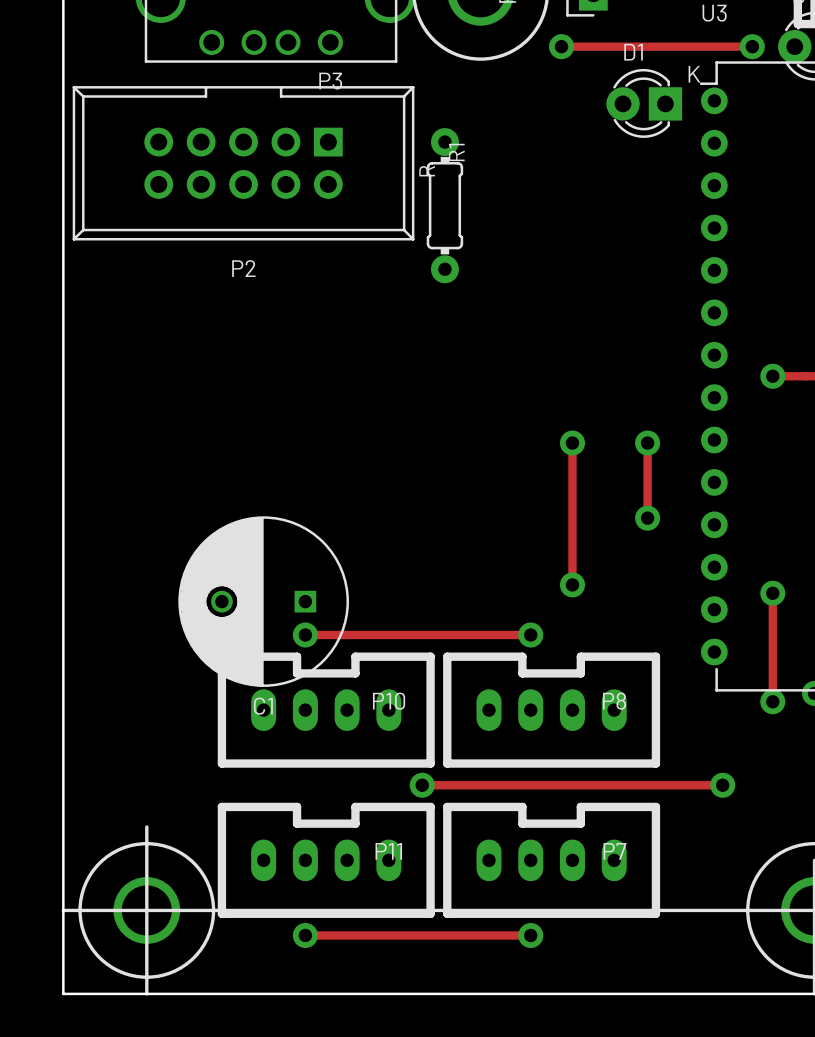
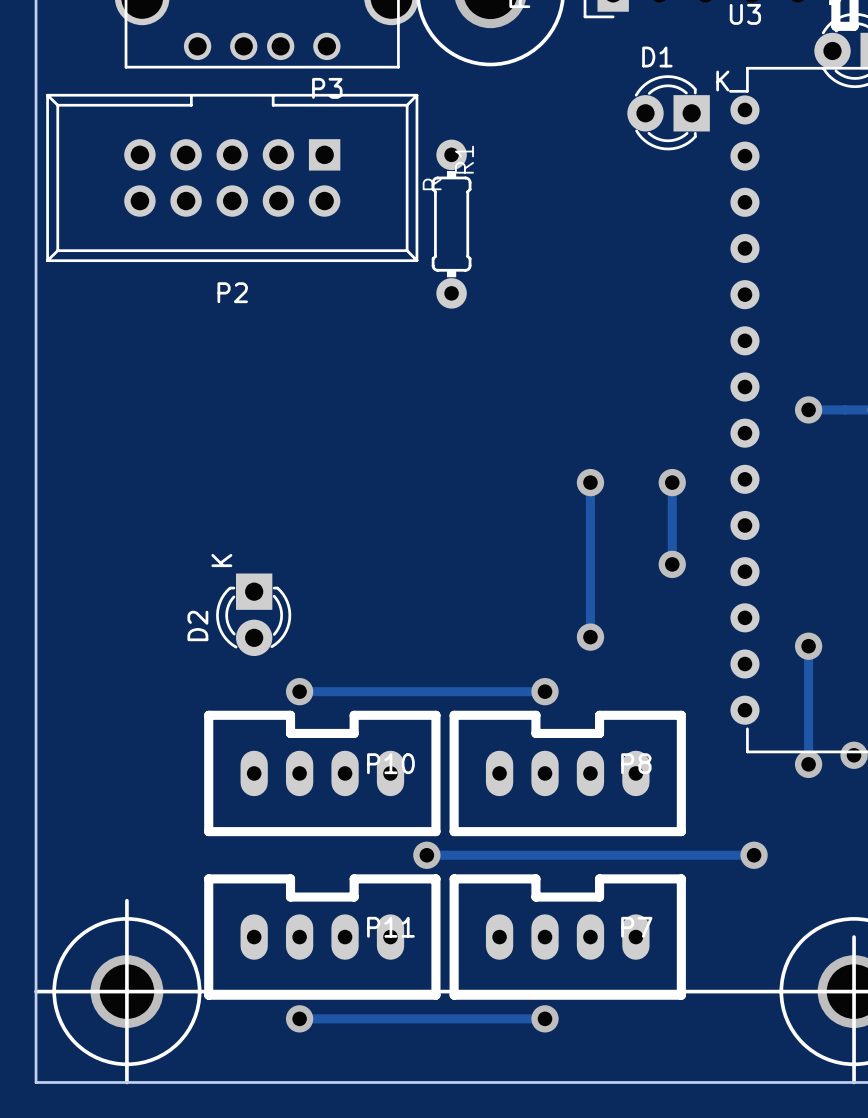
track: (561, 46) (752, 46) -> none
via: (561, 46) -> none
via: (752, 46) -> none
D2: none -> (253, 614)
C1: (263, 601) -> none

